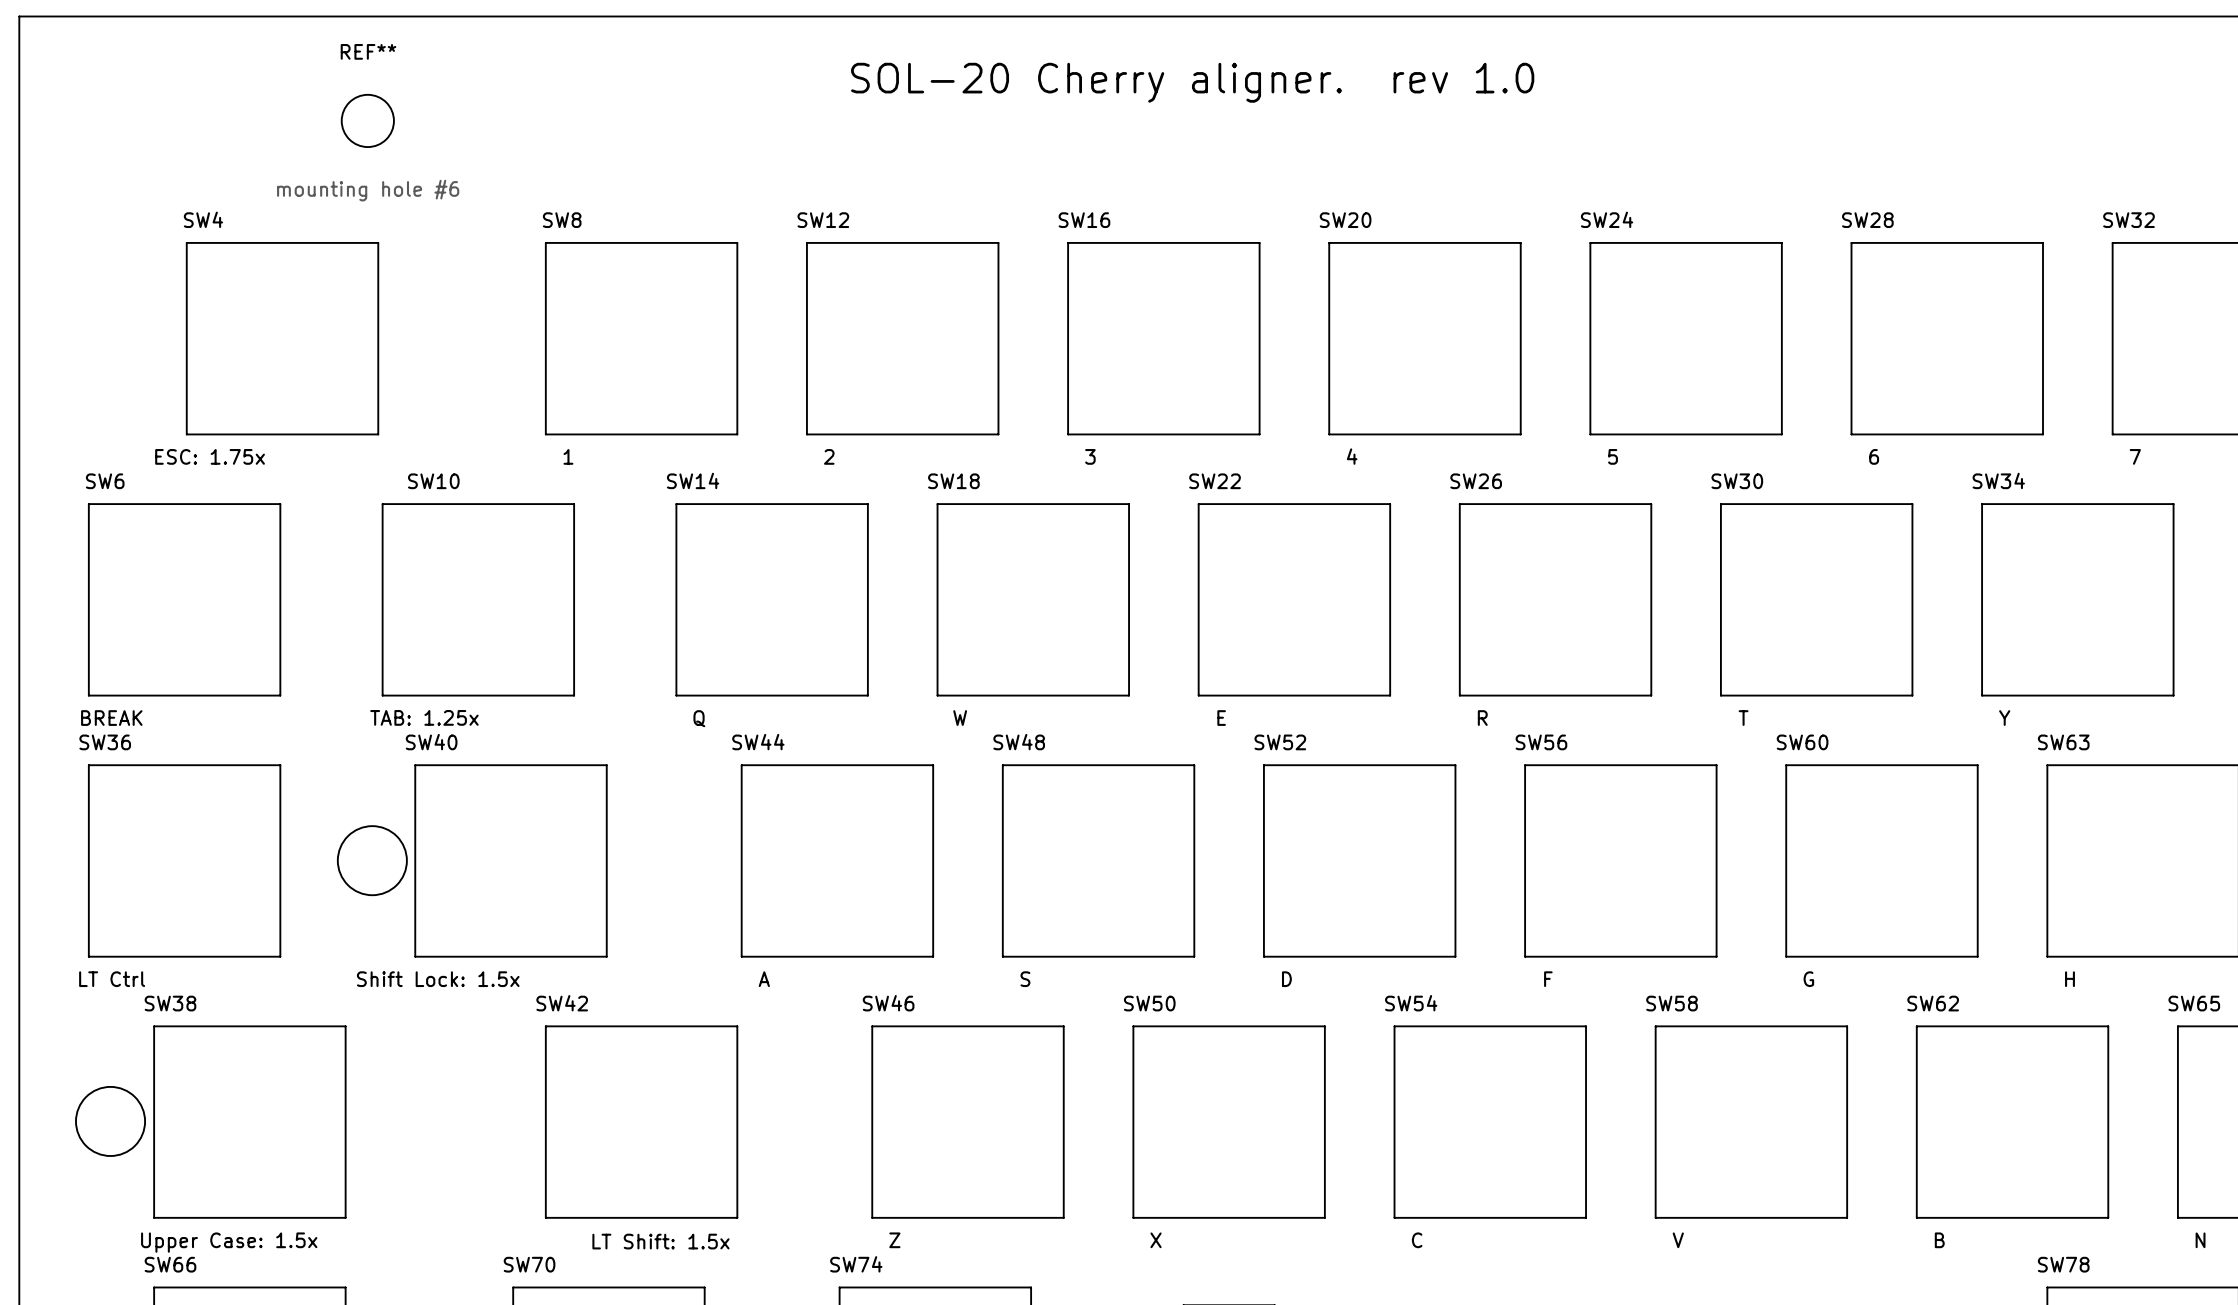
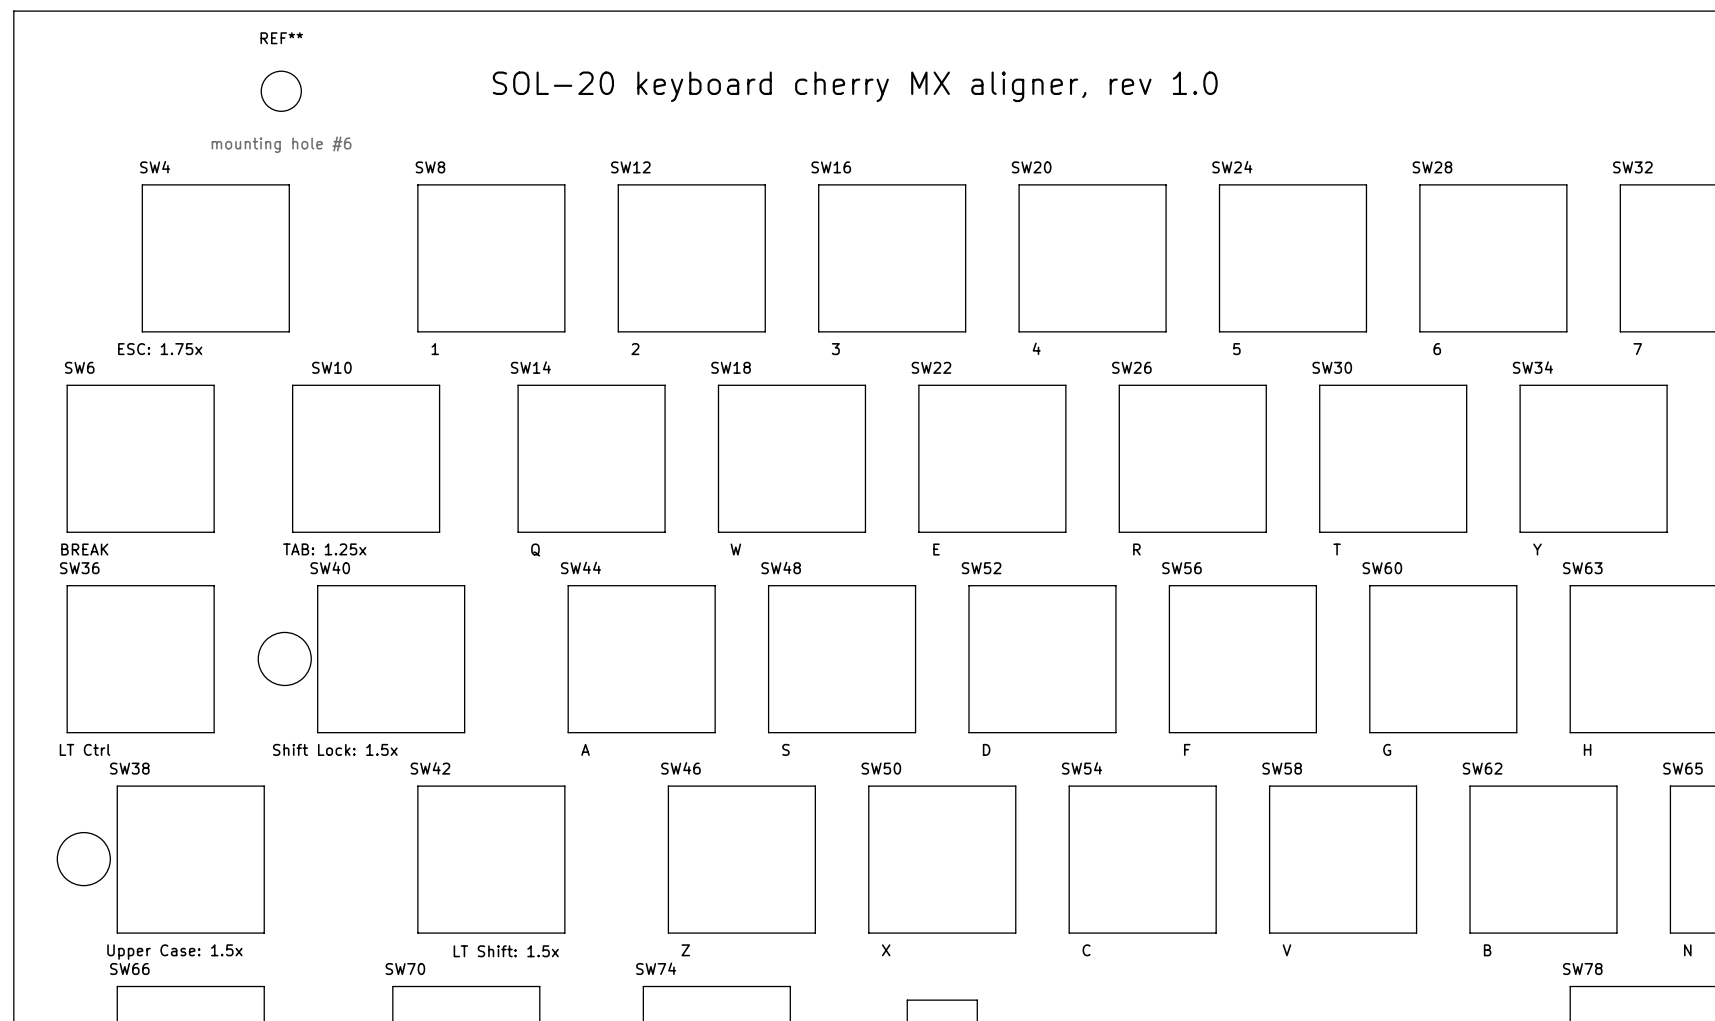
text: SOL-20 Cherry aligner. rev 1.0 (1192, 82) -> none
text: none -> SOL-20 keyboard cherry MX aligner, rev 1.0 (855, 86)

